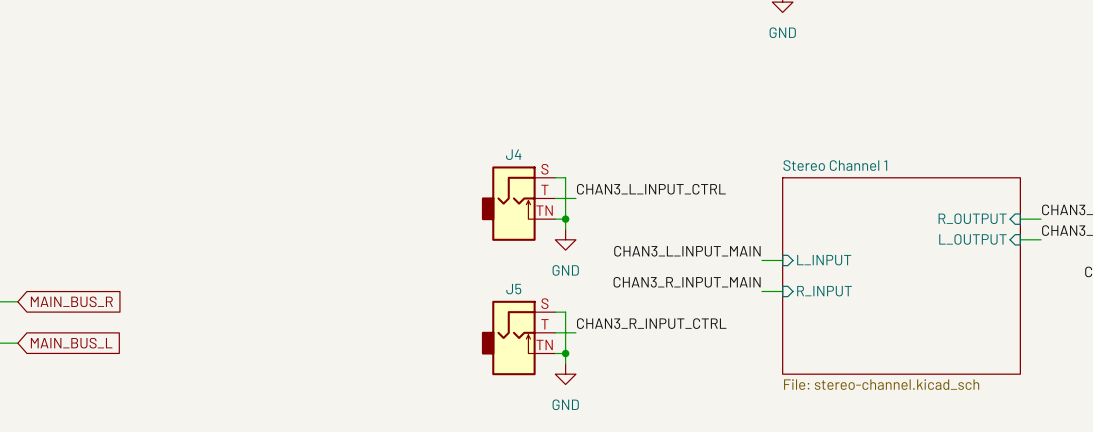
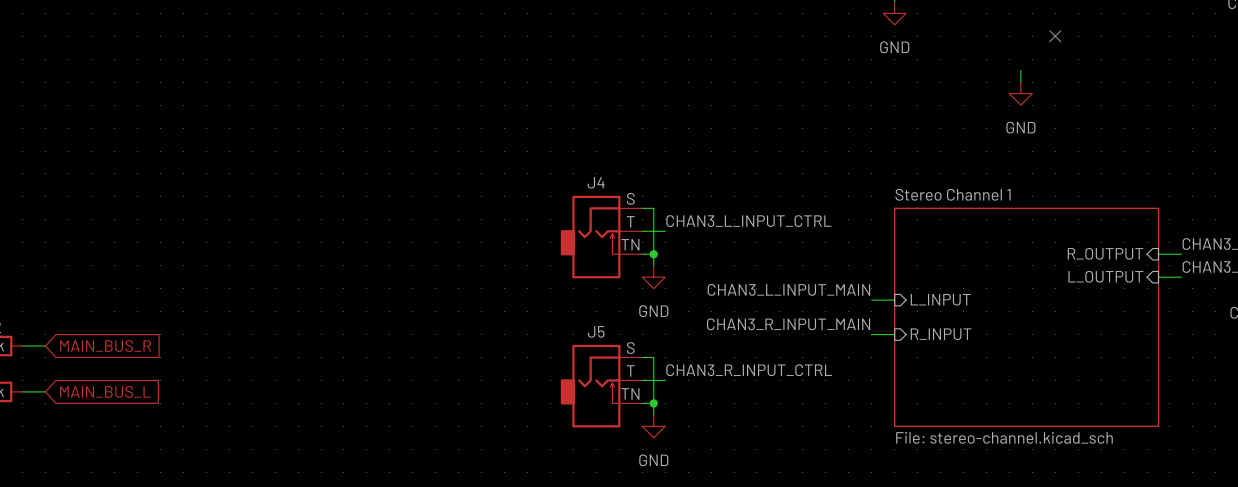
no-connect mark: none -> (1055, 36)
wire: none -> (1020, 70) (1020, 82)
power symbol: none -> GND (1020, 93)

